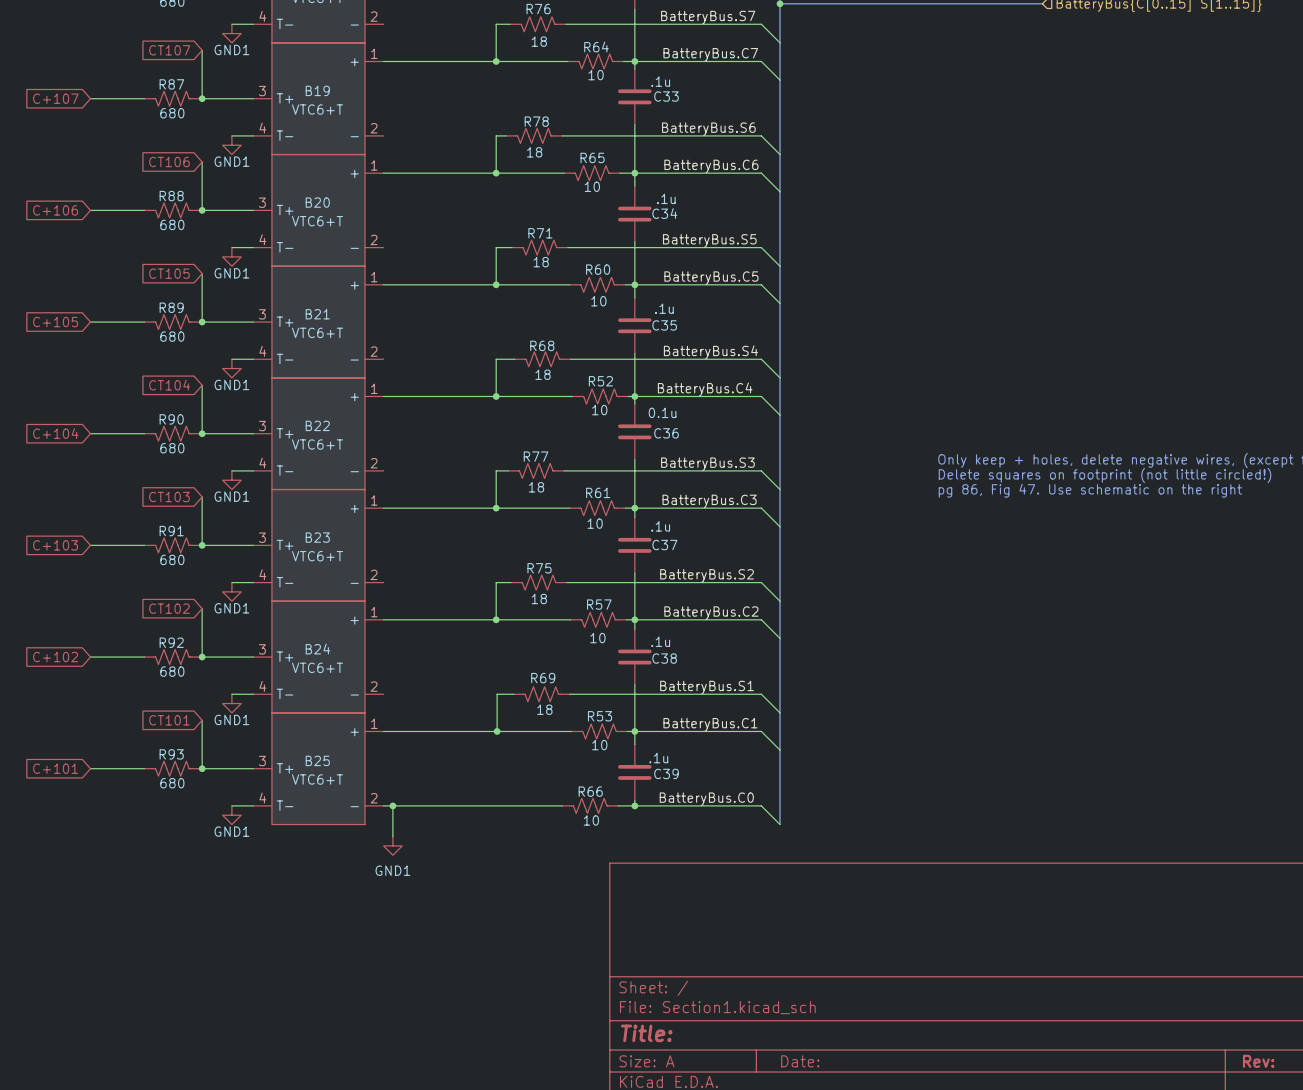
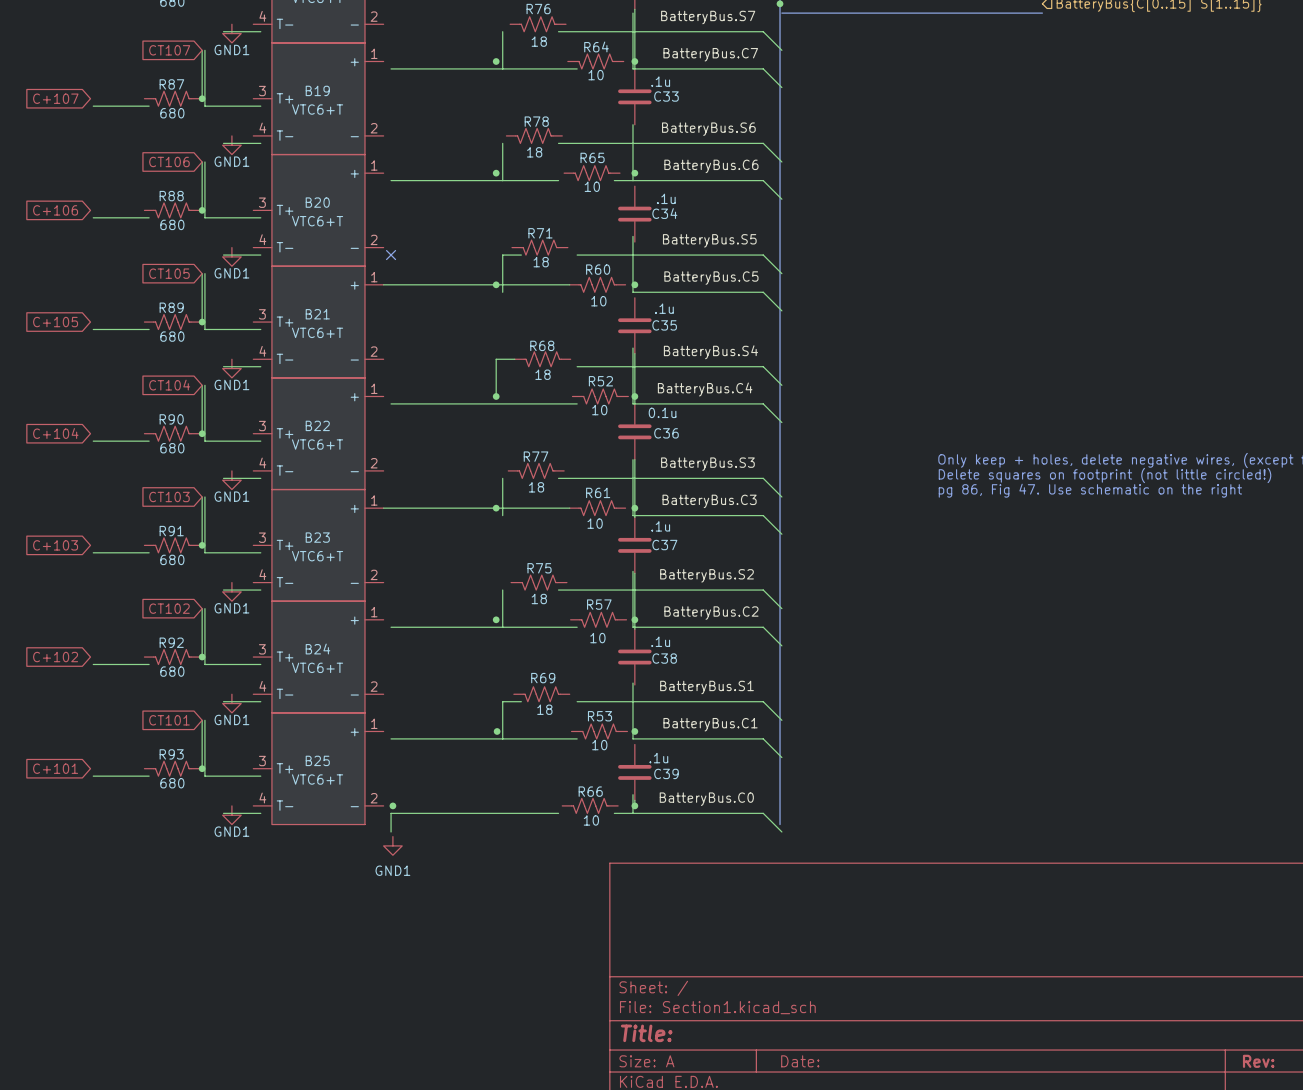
bus: (780, 3) (1042, 3) -> none
wire: none -> (632, 13) (632, 68) (763, 68) (781, 87)
bus: none -> (781, 13) (1042, 13)
wire: (231, 24) (253, 24) -> none
wire: (510, 24) (496, 24) (496, 61) -> none
wire: (565, 24) (761, 24) (780, 42) -> none
wire: none -> (223, 31) (260, 31)
wire: none -> (502, 31) (502, 68)
wire: none -> (558, 31) (763, 31) (781, 50)
wire: none -> (204, 50) (204, 106) (260, 106)
wire: (383, 61) (567, 61) -> none
wire: (623, 61) (761, 61) (780, 80) -> none
wire: none -> (391, 68) (577, 68)
wire: (90, 98) (144, 98) -> none
wire: (200, 98) (253, 98) -> none
wire: none -> (93, 106) (149, 106)
wire: (634, 124) (634, 186) -> none
wire: (231, 135) (253, 135) -> none
wire: (506, 135) (496, 135) (496, 173) -> none
wire: (562, 135) (761, 135) (780, 154) -> none
wire: none -> (223, 143) (260, 143)
wire: none -> (502, 143) (502, 180)
wire: none -> (558, 143) (763, 143) (781, 161)
wire: none -> (204, 161) (204, 217) (260, 217)
wire: (383, 173) (564, 173) -> none
wire: (619, 173) (761, 173) (780, 191) -> none
wire: none -> (391, 180) (558, 180)
wire: none -> (614, 180) (763, 180) (781, 199)
wire: (90, 210) (144, 210) -> none
wire: (200, 210) (253, 210) -> none
wire: none -> (93, 217) (149, 217)
wire: none -> (632, 236) (632, 292) (763, 292) (781, 310)
wire: (634, 242) (634, 297) -> (632, 124) (632, 180)
wire: (231, 247) (253, 247) -> none
wire: (512, 247) (496, 247) (496, 284) -> none
wire: (567, 247) (761, 247) (780, 266) -> none
wire: none -> (223, 255) (260, 255)
no-connect mark: none -> (391, 255)
wire: none -> (521, 255) (502, 255) (502, 292)
wire: none -> (577, 255) (763, 255) (781, 273)
wire: none -> (204, 273) (204, 329) (260, 329)
wire: (625, 284) (761, 284) (780, 303) -> none
wire: (90, 322) (144, 322) -> none
wire: (200, 322) (253, 322) -> none
wire: none -> (93, 329) (149, 329)
wire: none -> (632, 348) (632, 403) (763, 403) (781, 422)
wire: (231, 359) (253, 359) -> none
wire: (570, 359) (761, 359) (780, 377) -> none
wire: none -> (223, 366) (260, 366)
wire: none -> (577, 366) (763, 366) (781, 385)
wire: none -> (204, 385) (204, 441) (260, 441)
wire: (383, 396) (572, 396) -> none
wire: (628, 396) (761, 396) (780, 415) -> none
wire: none -> (391, 403) (577, 403)
wire: (90, 433) (144, 433) -> none
wire: (200, 433) (253, 433) -> none
wire: none -> (93, 441) (149, 441)
wire: none -> (632, 459) (632, 515) (763, 515) (781, 534)
wire: (231, 470) (253, 470) -> none
wire: (508, 470) (496, 470) (496, 508) -> none
wire: (564, 470) (761, 470) (780, 489) -> none
wire: none -> (223, 478) (260, 478)
wire: none -> (502, 478) (502, 515)
wire: none -> (558, 478) (763, 478) (781, 496)
wire: none -> (204, 496) (204, 552) (260, 552)
wire: (625, 508) (761, 508) (780, 526) -> none
wire: (90, 545) (144, 545) -> none
wire: (200, 545) (253, 545) -> none
wire: none -> (93, 552) (149, 552)
wire: none -> (632, 571) (632, 627) (763, 627) (781, 645)
wire: (231, 582) (253, 582) -> none
wire: (511, 582) (496, 582) (496, 619) -> none
wire: (566, 582) (761, 582) (780, 601) -> none
wire: none -> (223, 590) (260, 590)
wire: none -> (502, 590) (502, 627)
wire: none -> (558, 590) (763, 590) (781, 608)
wire: none -> (204, 608) (204, 664) (260, 664)
wire: (383, 619) (570, 619) -> none
wire: (626, 619) (761, 619) (780, 638) -> none
wire: none -> (391, 627) (577, 627)
wire: (90, 657) (144, 657) -> none
wire: (200, 657) (253, 657) -> none
wire: none -> (93, 664) (149, 664)
wire: none -> (632, 683) (632, 738) (763, 738) (781, 757)
wire: (634, 684) (634, 744) -> none
wire: (231, 694) (253, 694) -> none
wire: (513, 694) (497, 694) (497, 731) -> none
wire: (569, 694) (761, 694) (780, 712) -> none
wire: none -> (223, 701) (260, 701)
wire: none -> (521, 701) (502, 701) (502, 738)
wire: none -> (577, 701) (763, 701) (781, 720)
wire: none -> (204, 720) (204, 776) (260, 776)
wire: (383, 731) (571, 731) -> none
wire: (627, 731) (761, 731) (780, 750) -> none
wire: none -> (391, 738) (577, 738)
wire: (90, 768) (144, 768) -> none
wire: (200, 768) (253, 768) -> none
wire: none -> (93, 776) (149, 776)
wire: none -> (632, 794) (632, 813)
wire: (231, 805) (253, 805) -> none
wire: (383, 805) (562, 805) -> none
wire: (392, 805) (392, 836) -> none
wire: (618, 805) (761, 805) (780, 824) -> none
wire: none -> (223, 813) (260, 813)
wire: none -> (558, 813) (391, 813) (391, 831)
wire: none -> (614, 813) (763, 813) (781, 831)

